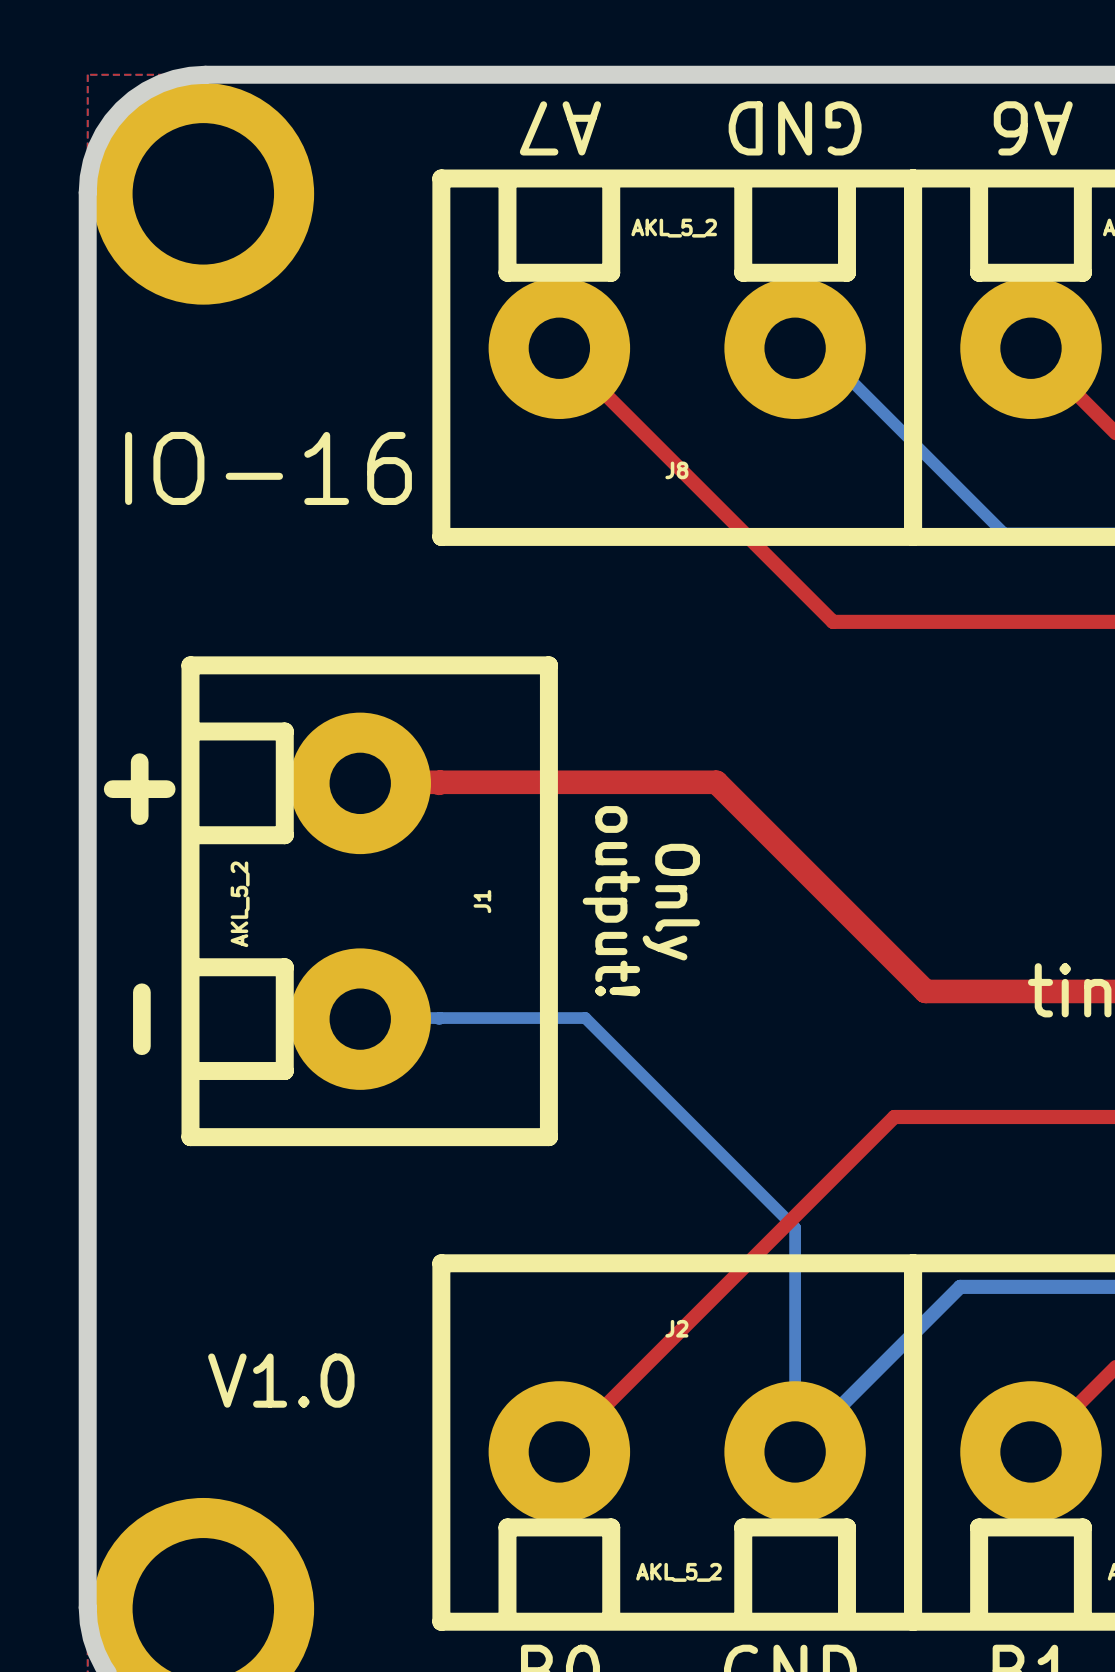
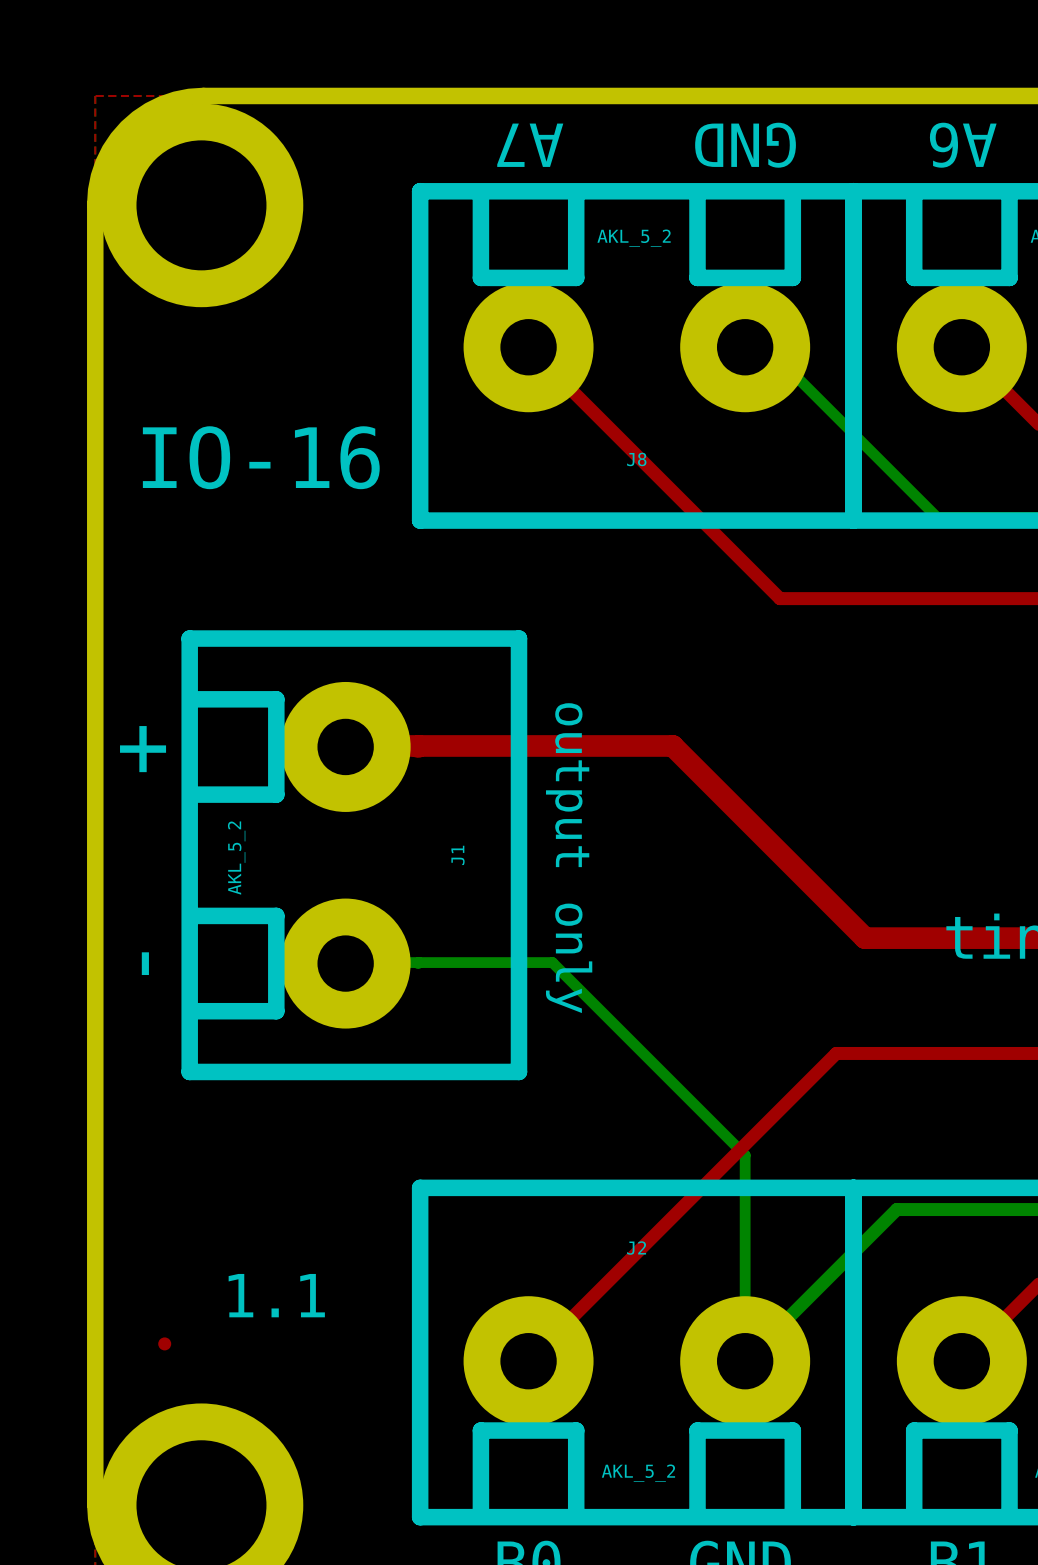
text: output! (611, 901) -> output only (569, 858)
text: Only (671, 902) -> none
text: V1.0 (281, 1380) -> 1.1 (276, 1295)
part: none -> (164, 1343)

